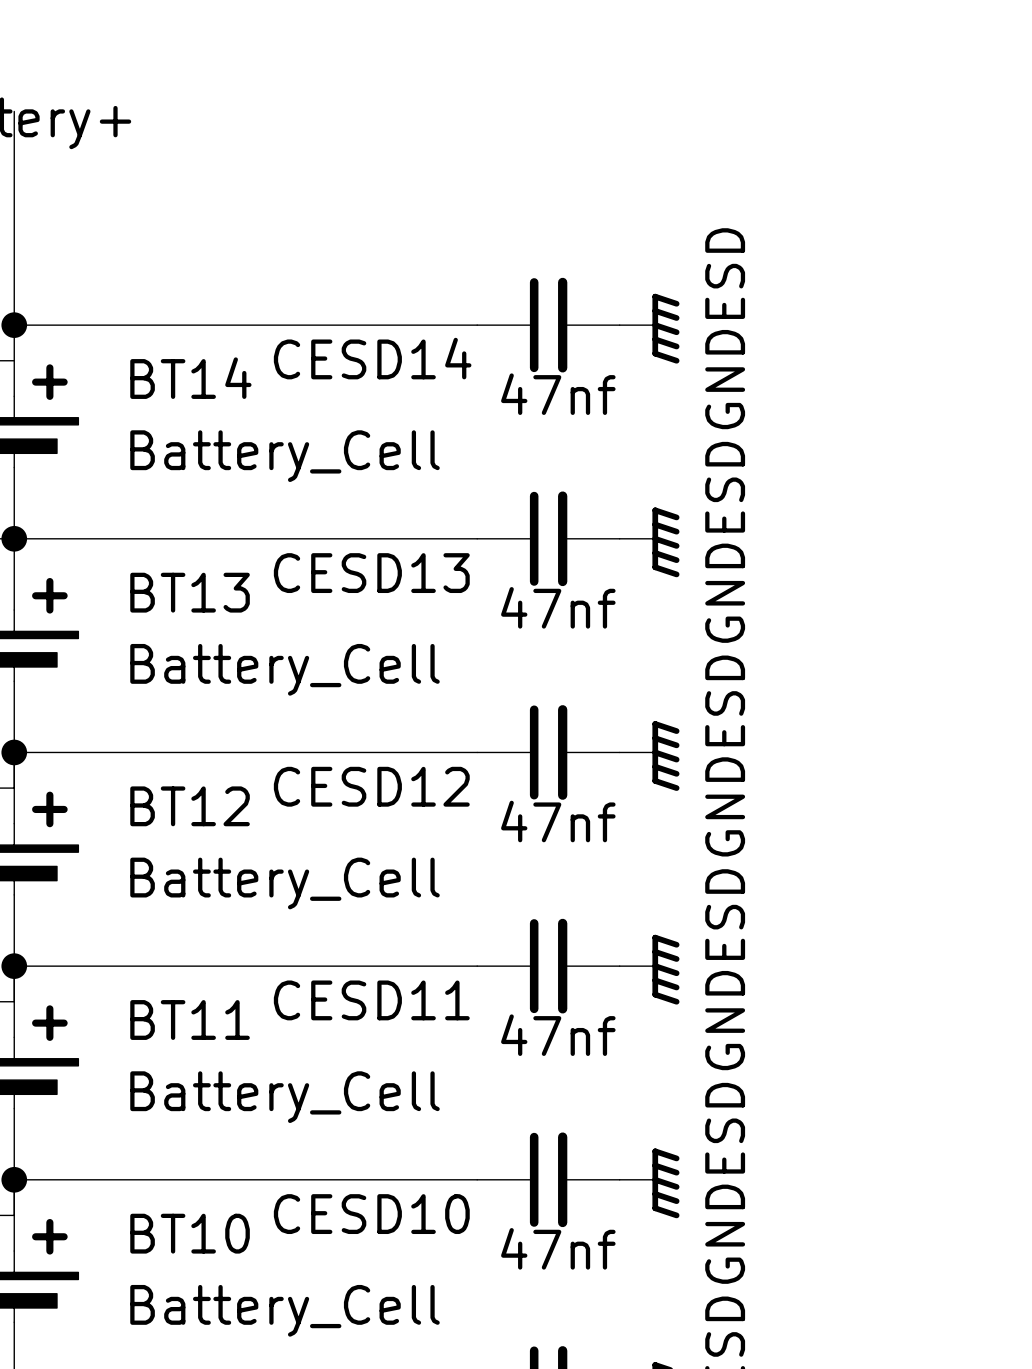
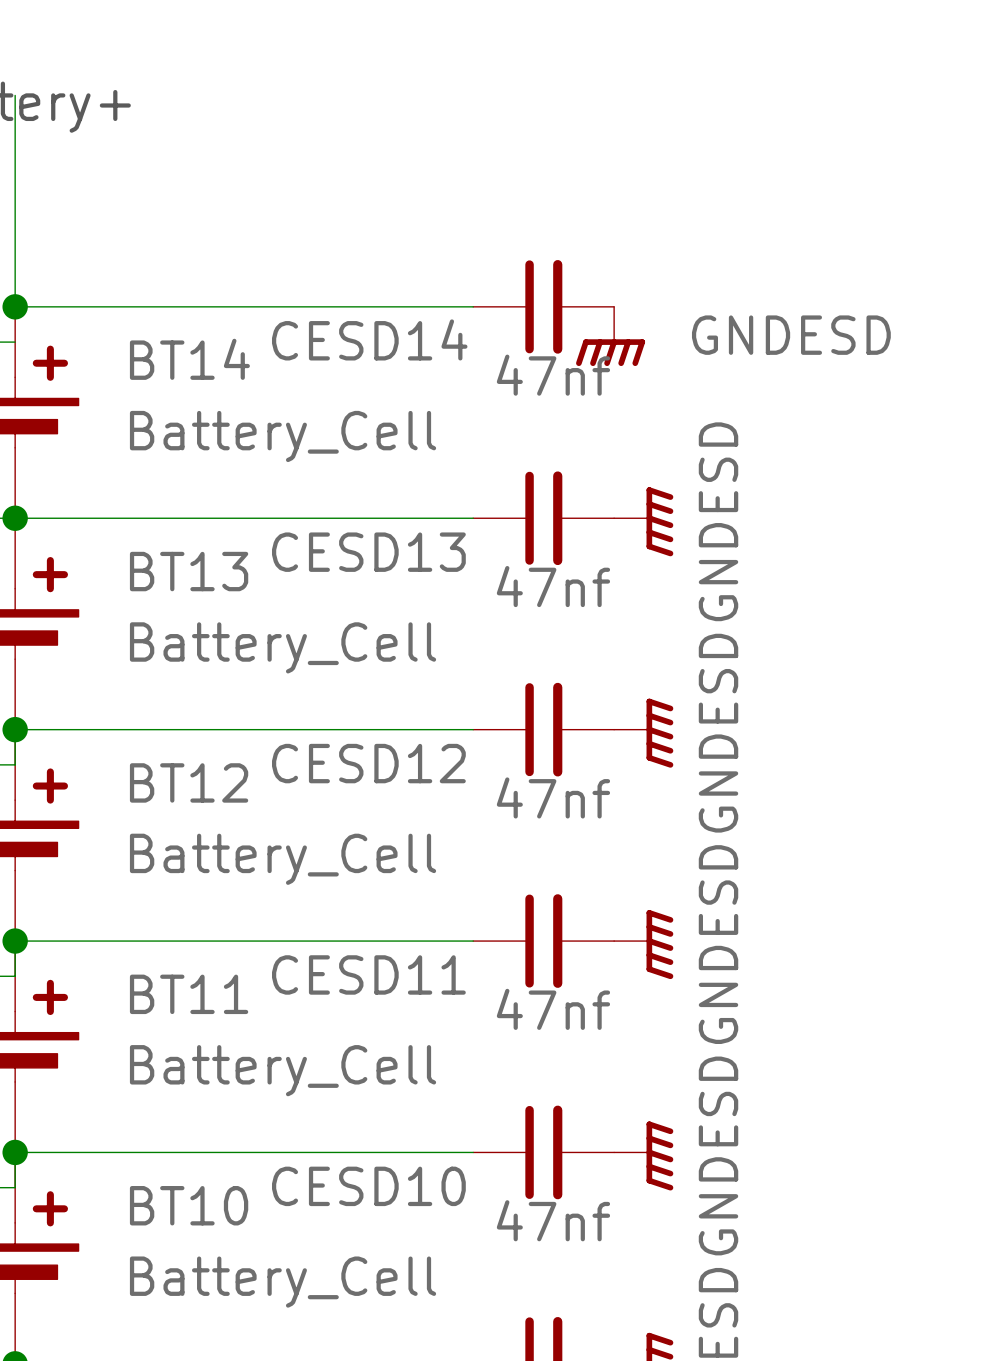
power symbol rotation: 0° (649, 328) -> 90° clockwise (610, 336)
power symbol position: GNDESD (649, 328) -> GNDESD (610, 336)
power symbol text position: GNDESD (725, 328) -> GNDESD (791, 335)

